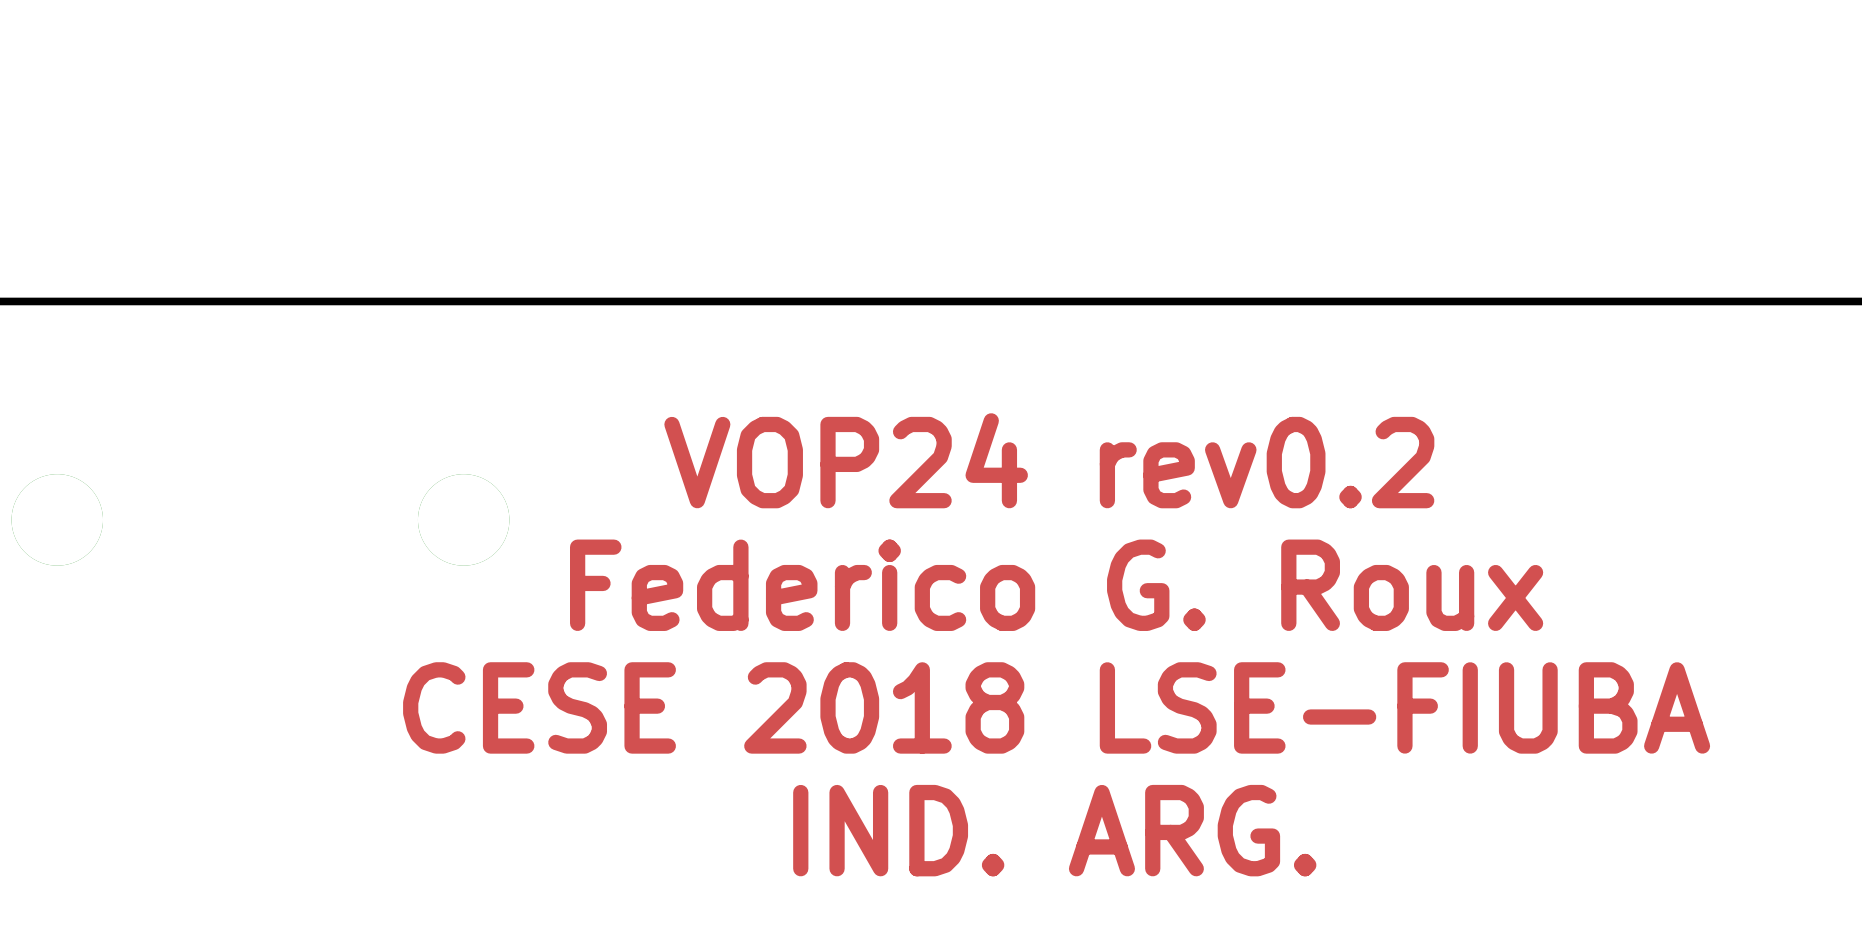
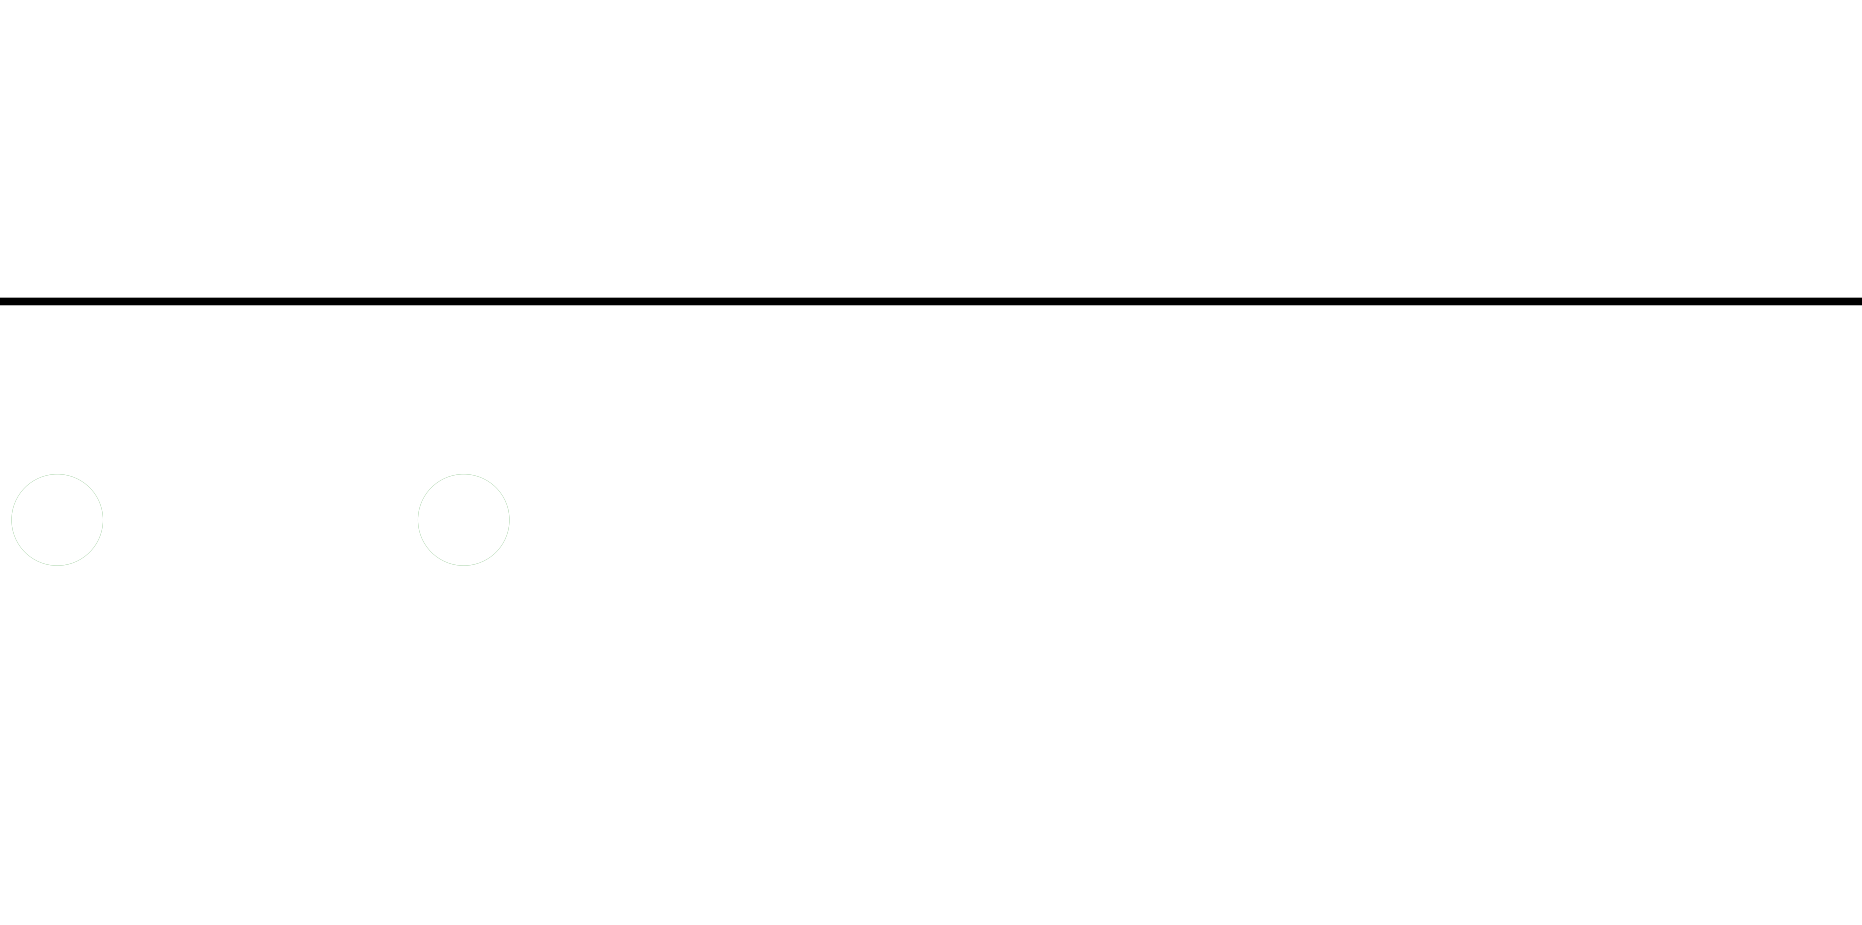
text: VOP24 rev0.2 (1049, 460) -> none
text: Federico G. Roux (1056, 585) -> none
text: CESE 2018 LSE-FIUBA (1056, 707) -> none
text: IND. ARG. (1054, 830) -> none

